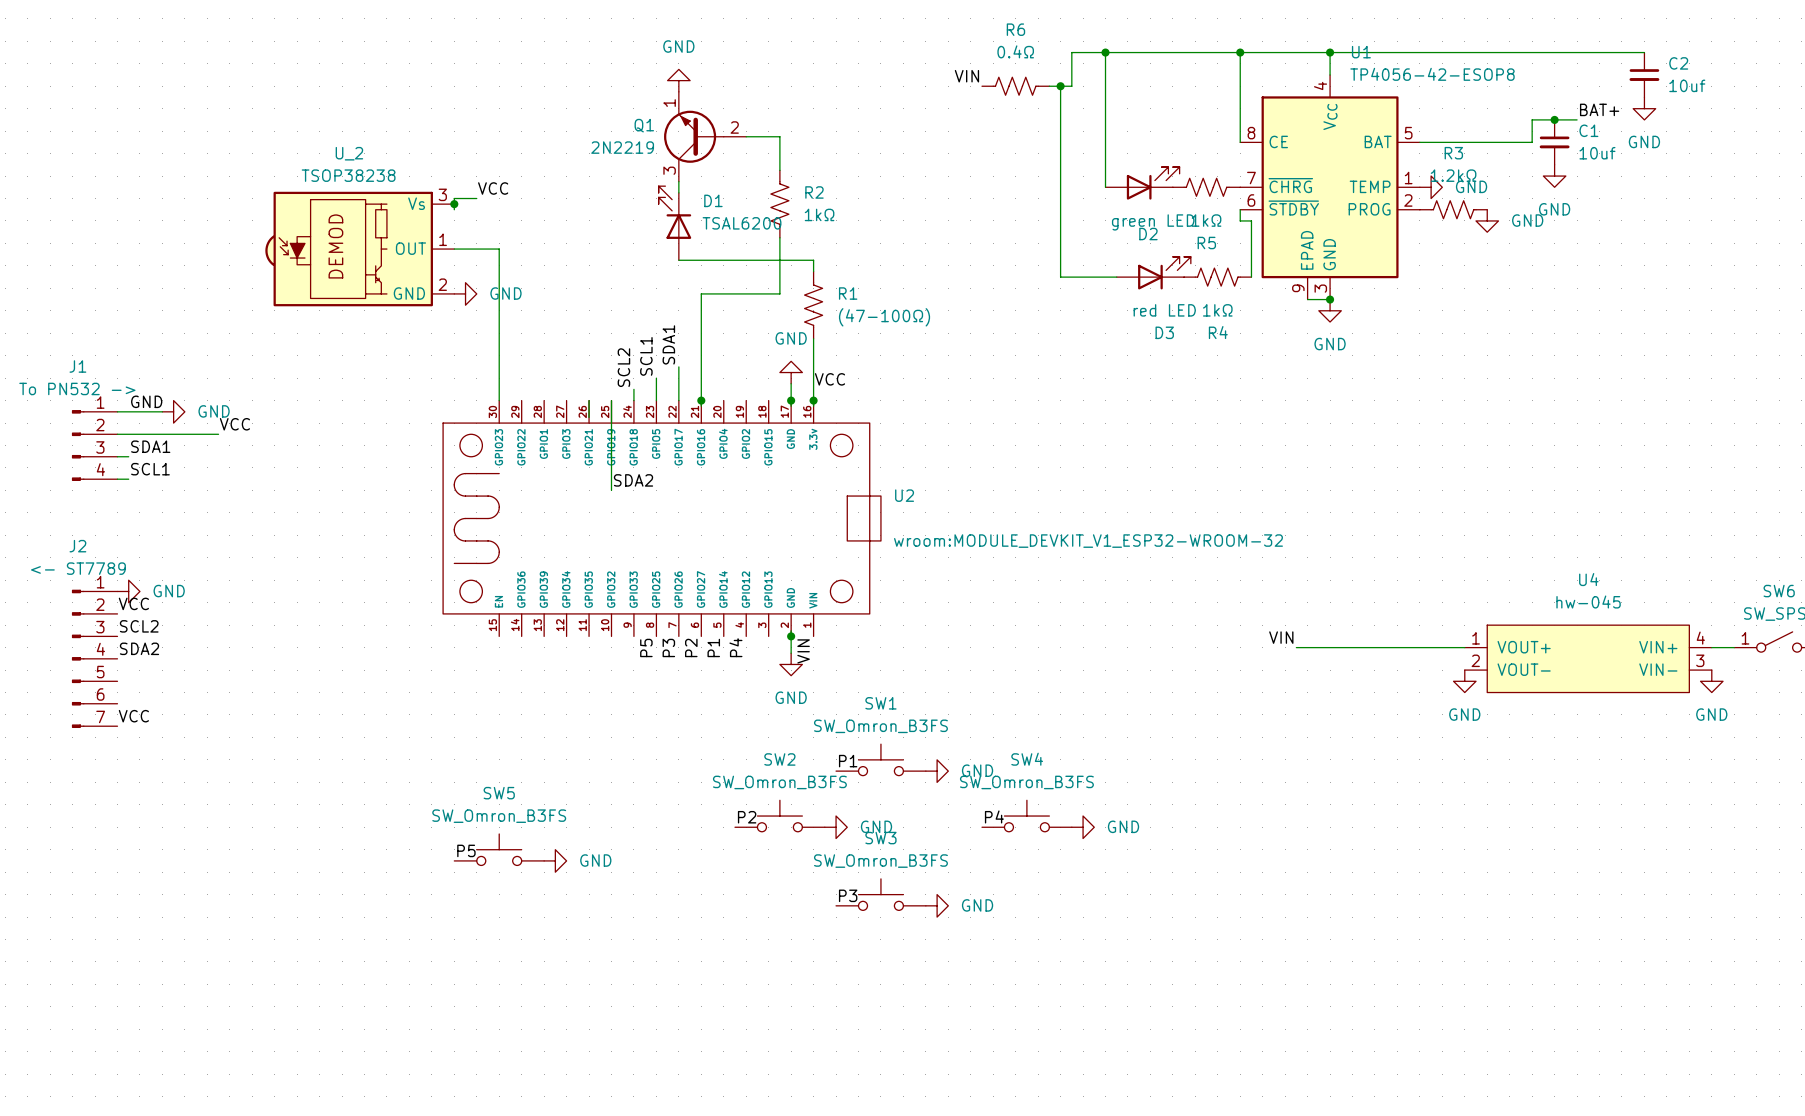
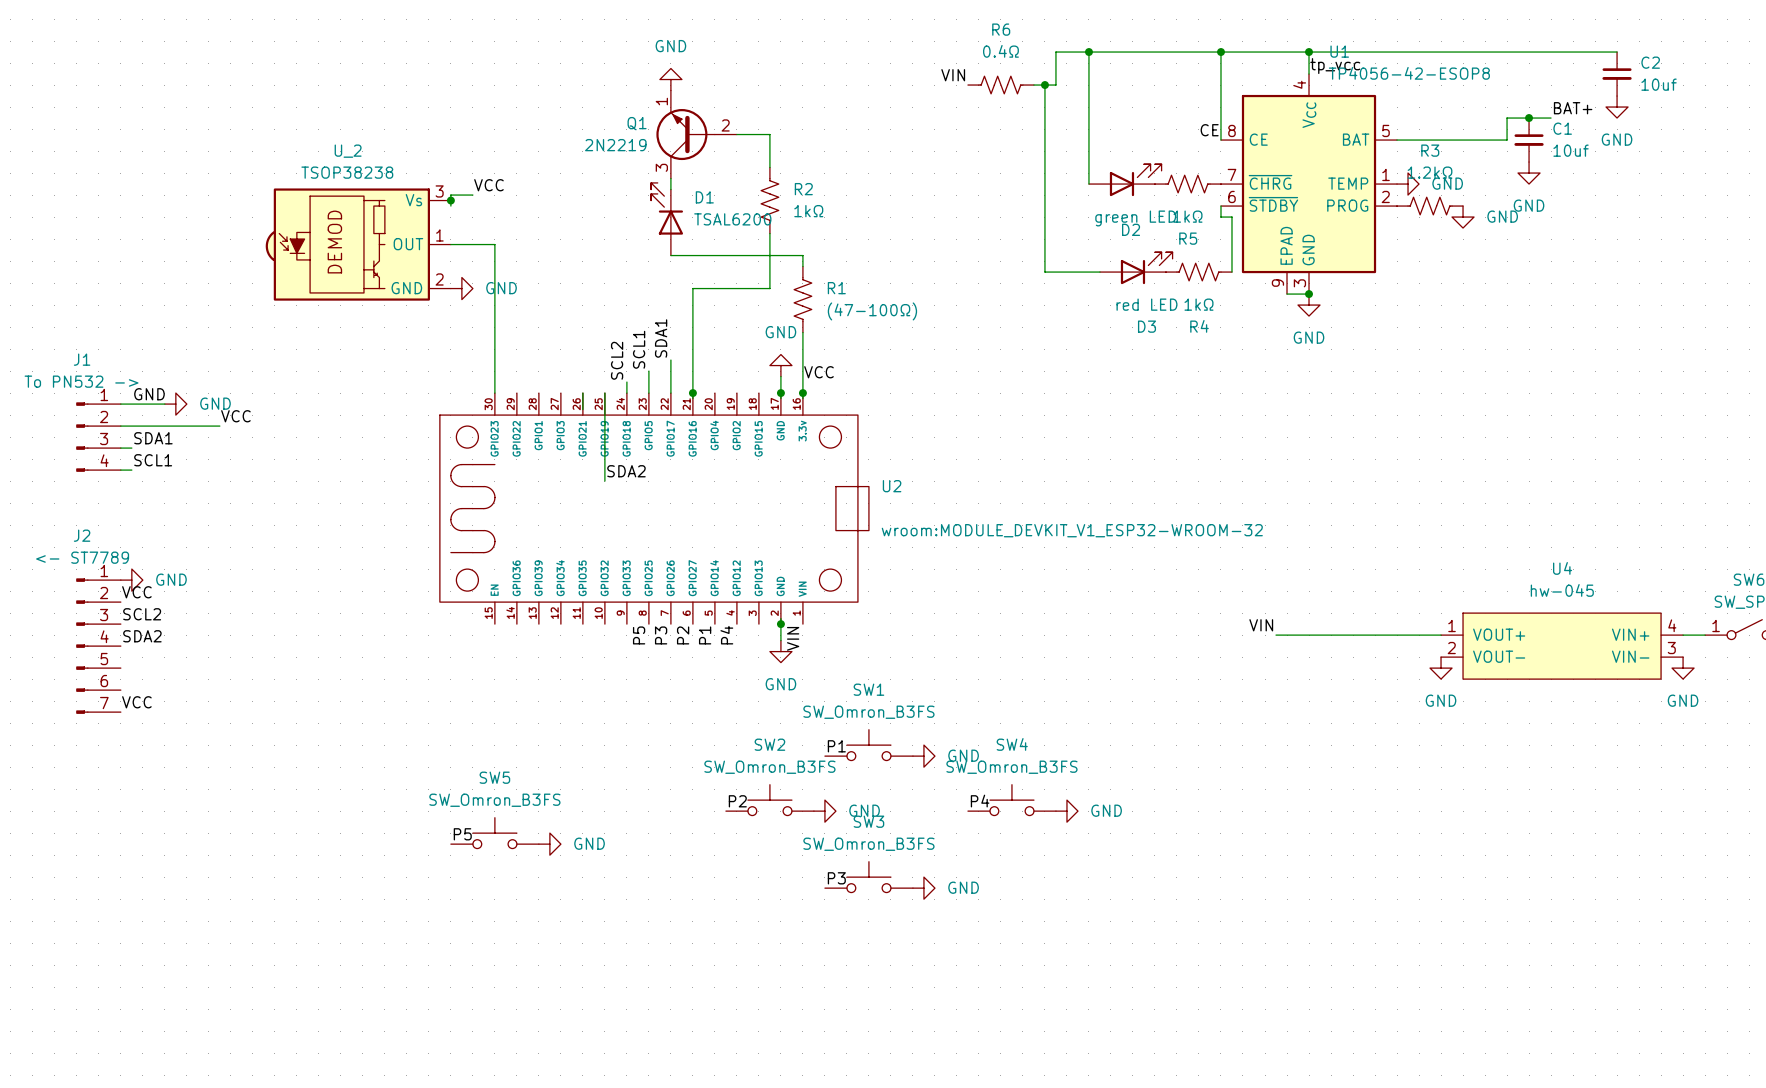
label: none -> tp_vcc (1335, 66)
label: none -> CE (1209, 130)

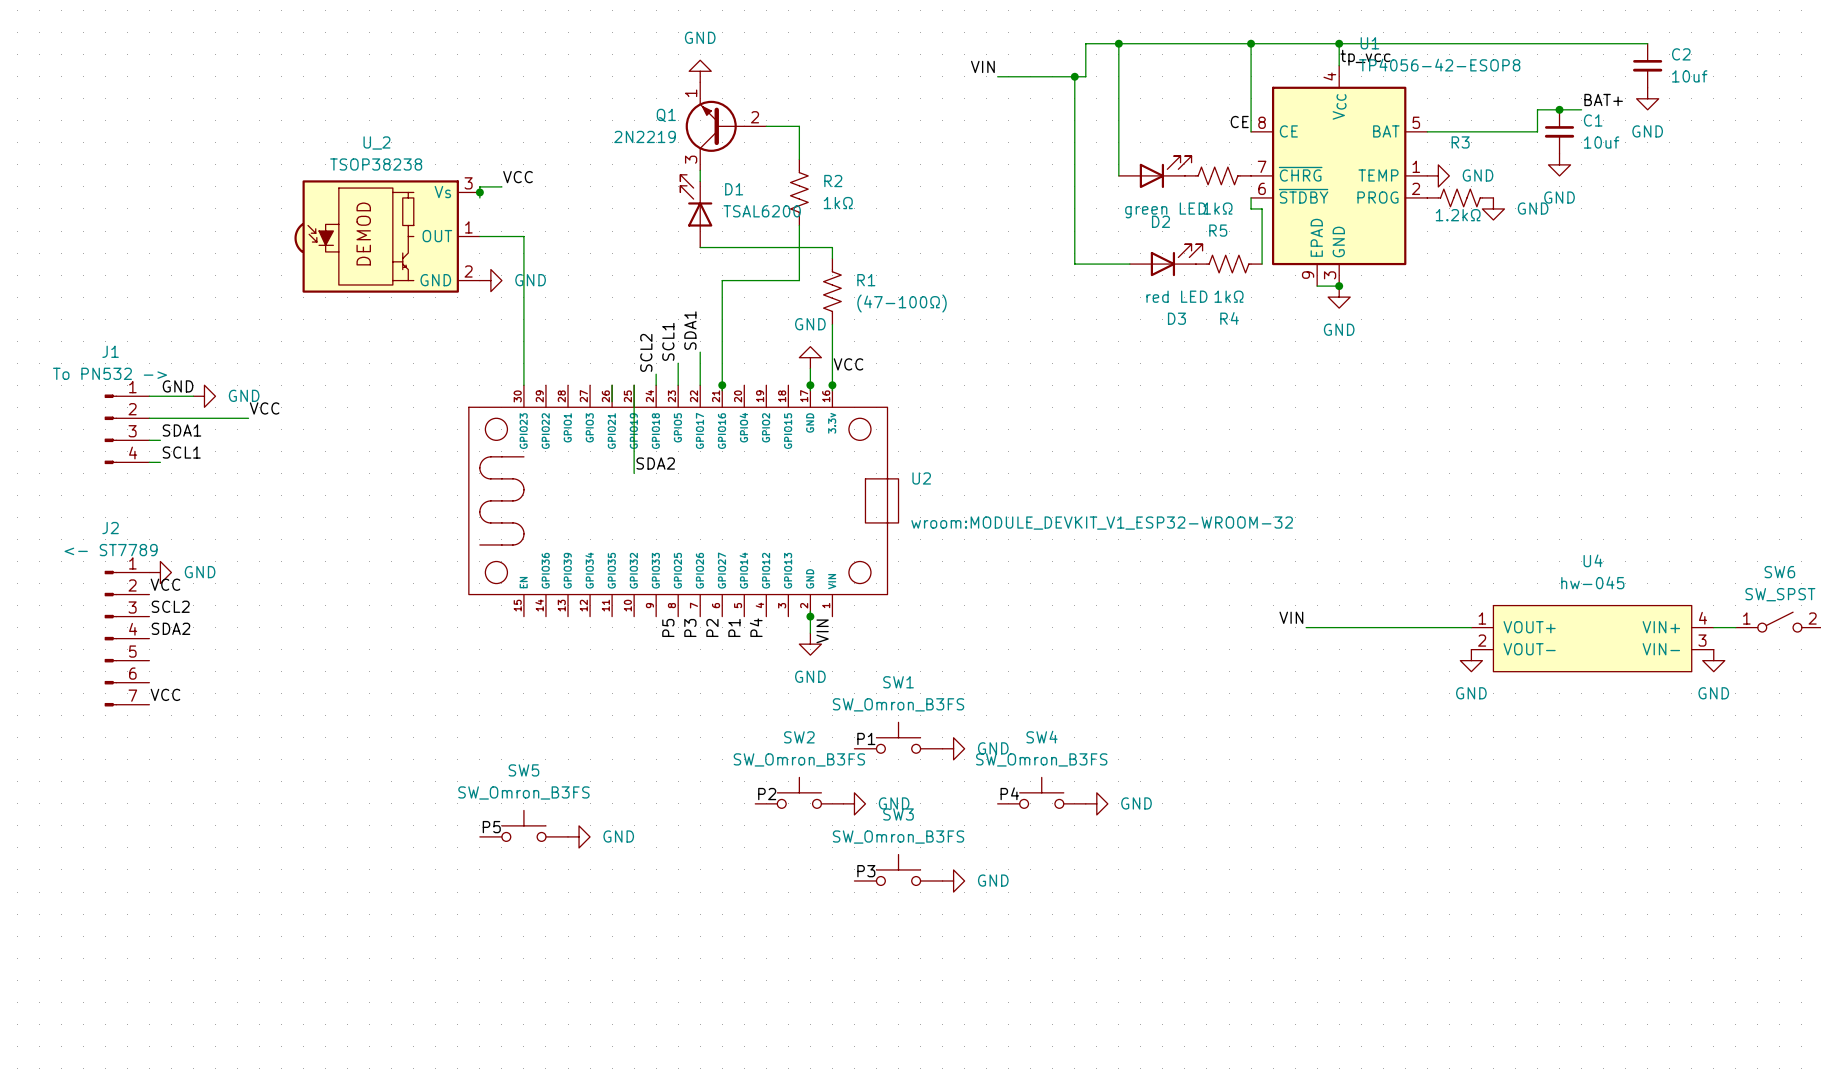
R6: 0.4Ω (1000, 85) -> none
R3 value position: 1.2kΩ (1430, 172) -> 1.2kΩ (1458, 215)

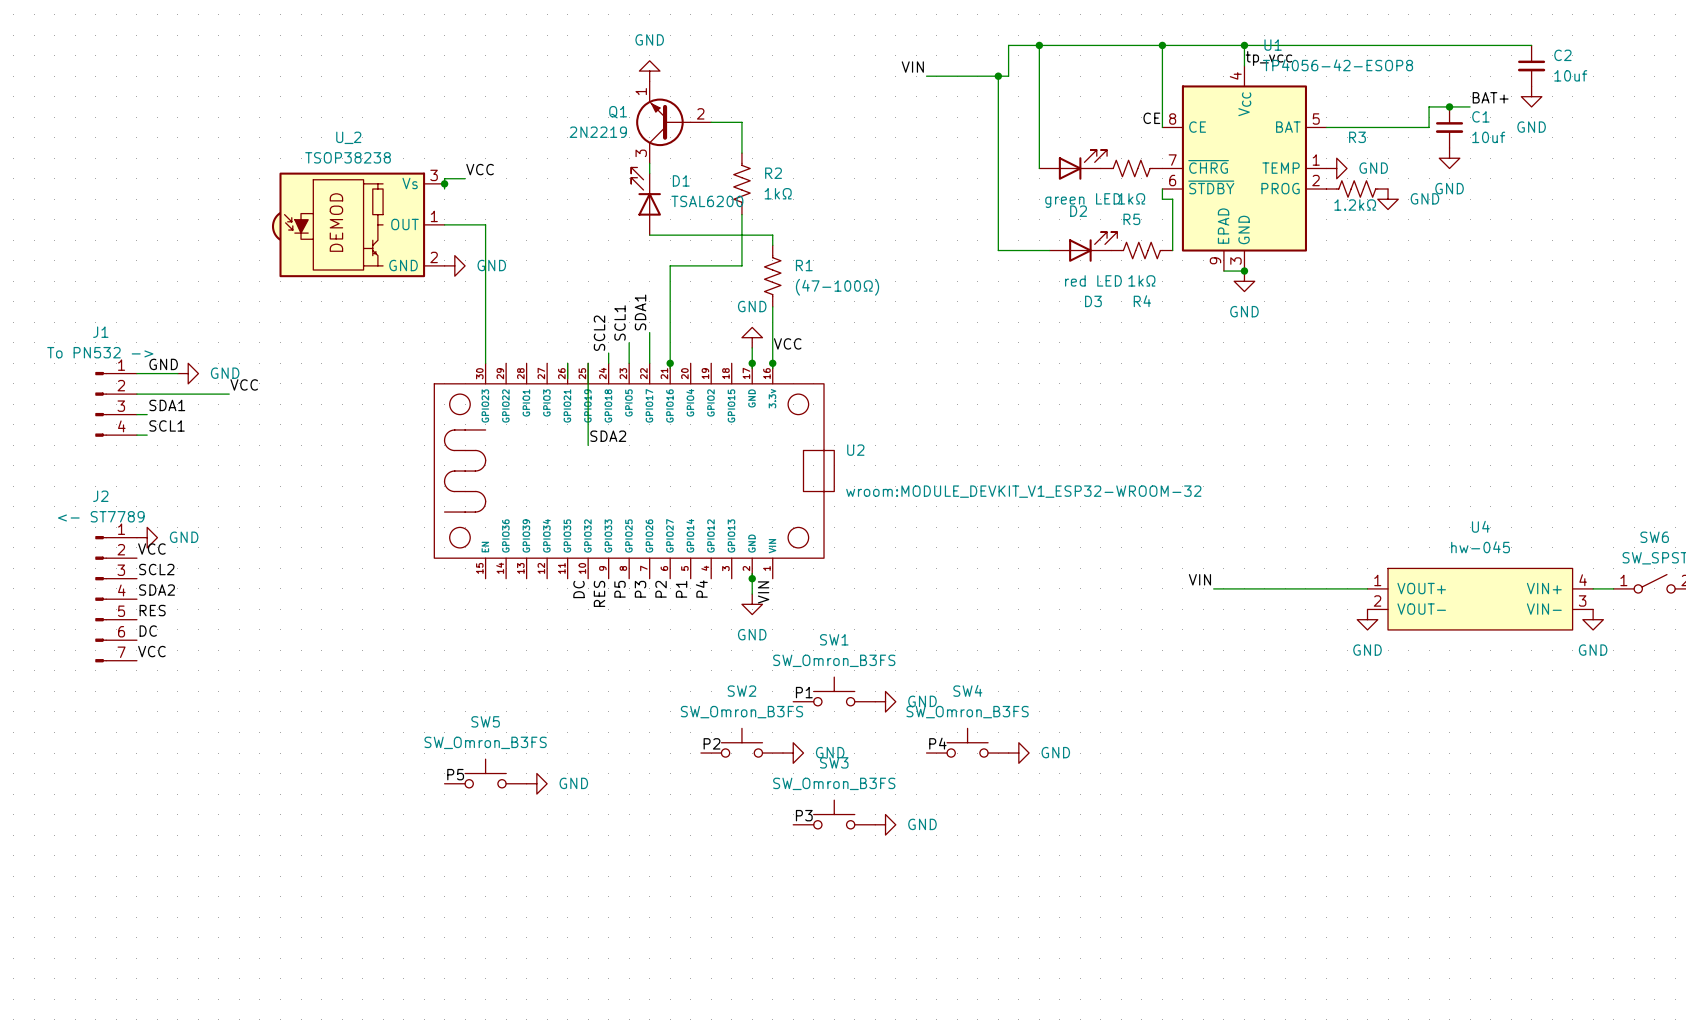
label: none -> DC (578, 589)
label: none -> RES (599, 593)
label: none -> RES (152, 610)
label: none -> DC (148, 631)

